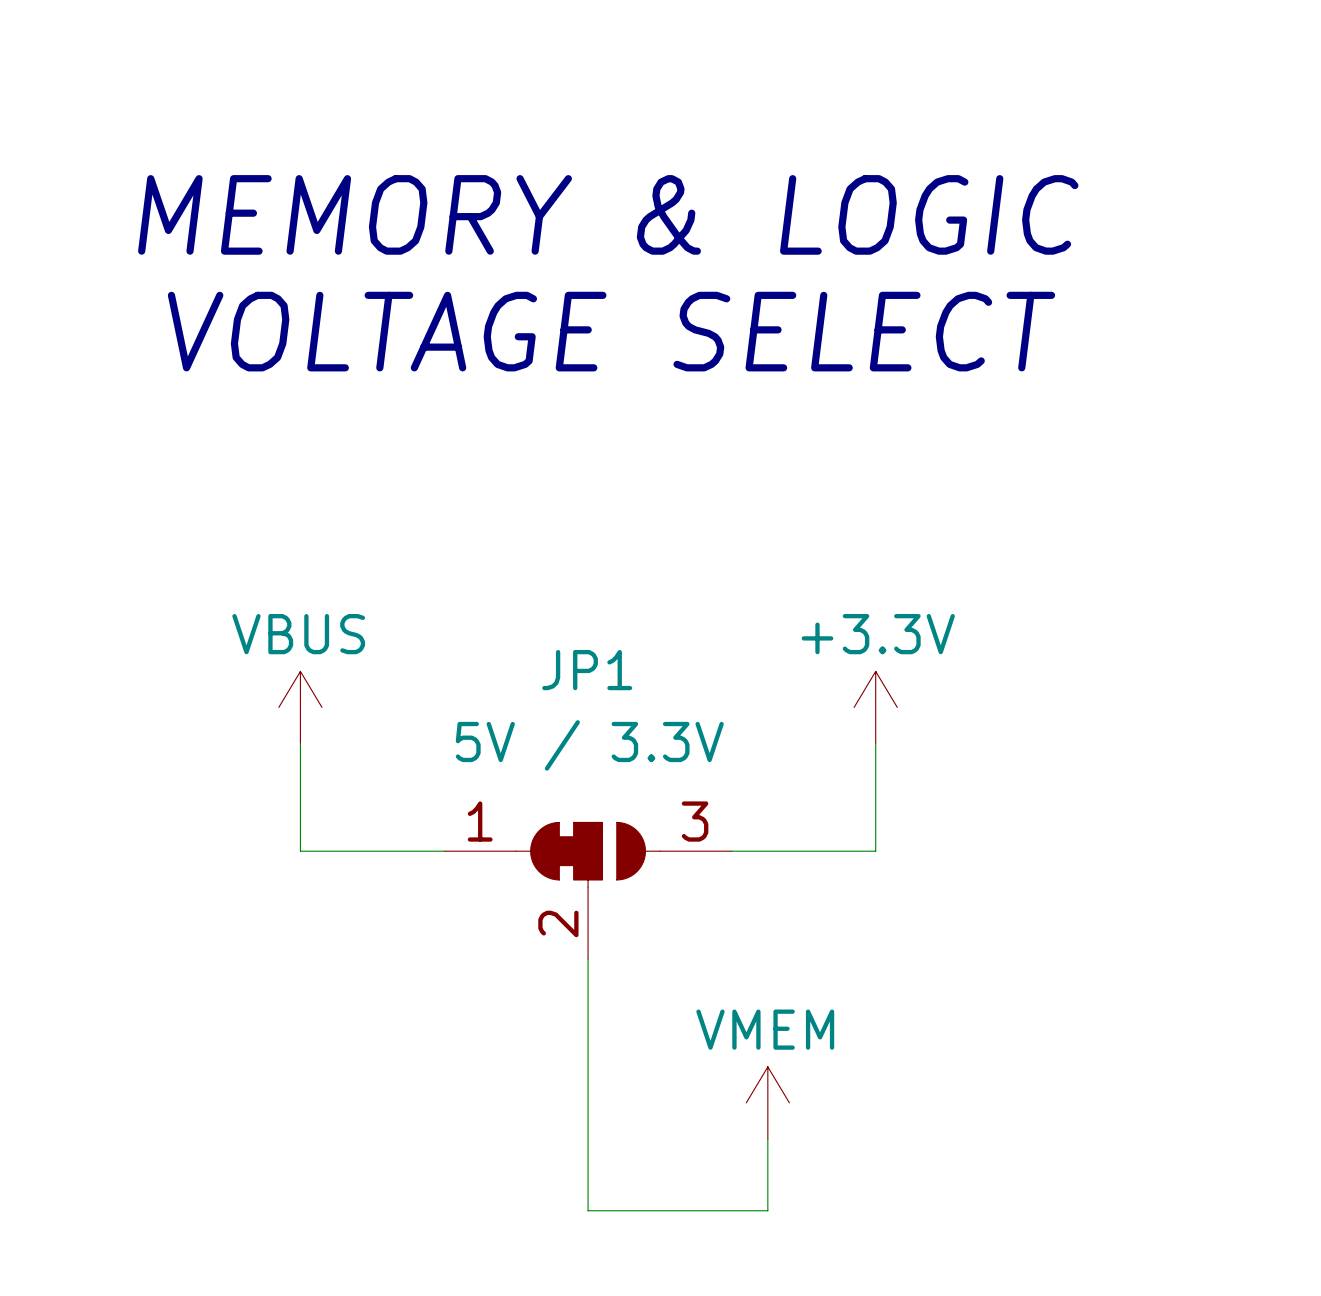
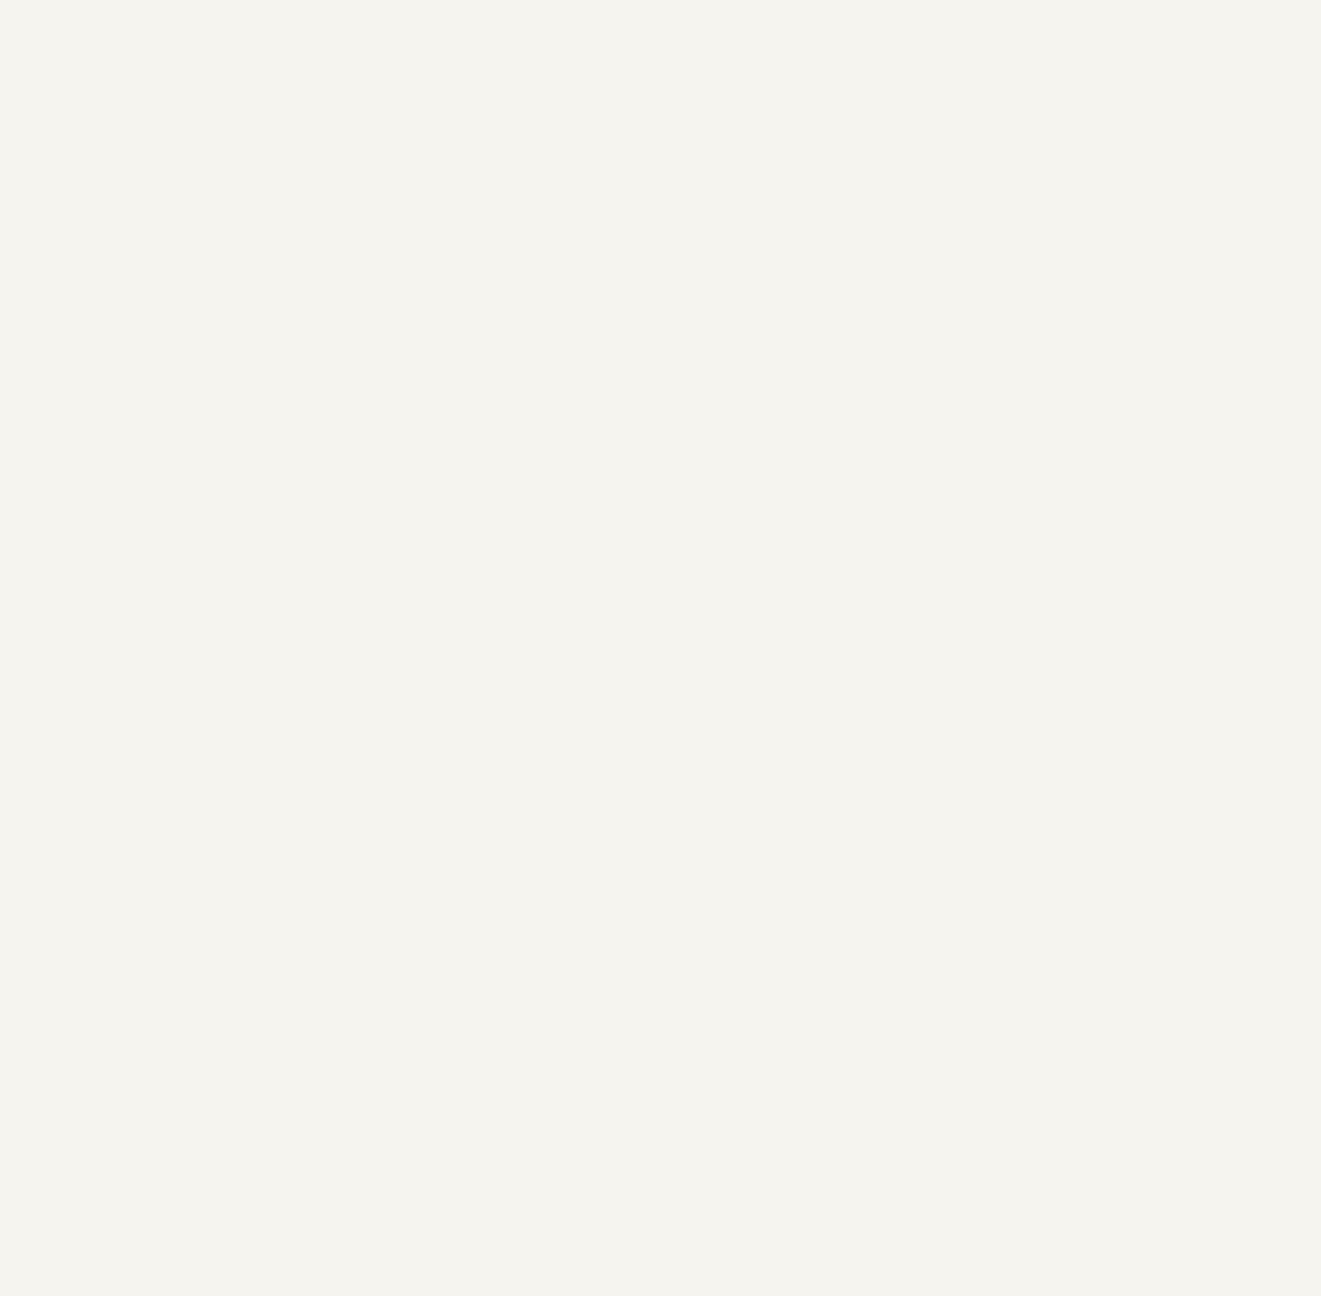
text: MEMORY & LOGIC (608, 214) -> none
text: VOLTAGE SELECT (611, 331) -> none
power symbol: VBUS (300, 707) -> none
power symbol: +3.3V (875, 707) -> none
wire: (300, 743) (300, 851) (444, 851) -> none
wire: (875, 743) (875, 851) (731, 851) -> none
JP1: 5V / 3.3V (588, 890) -> none
wire: (588, 959) (588, 1210) (767, 1210) (767, 1138) -> none
power symbol: VMEM (767, 1102) -> none

